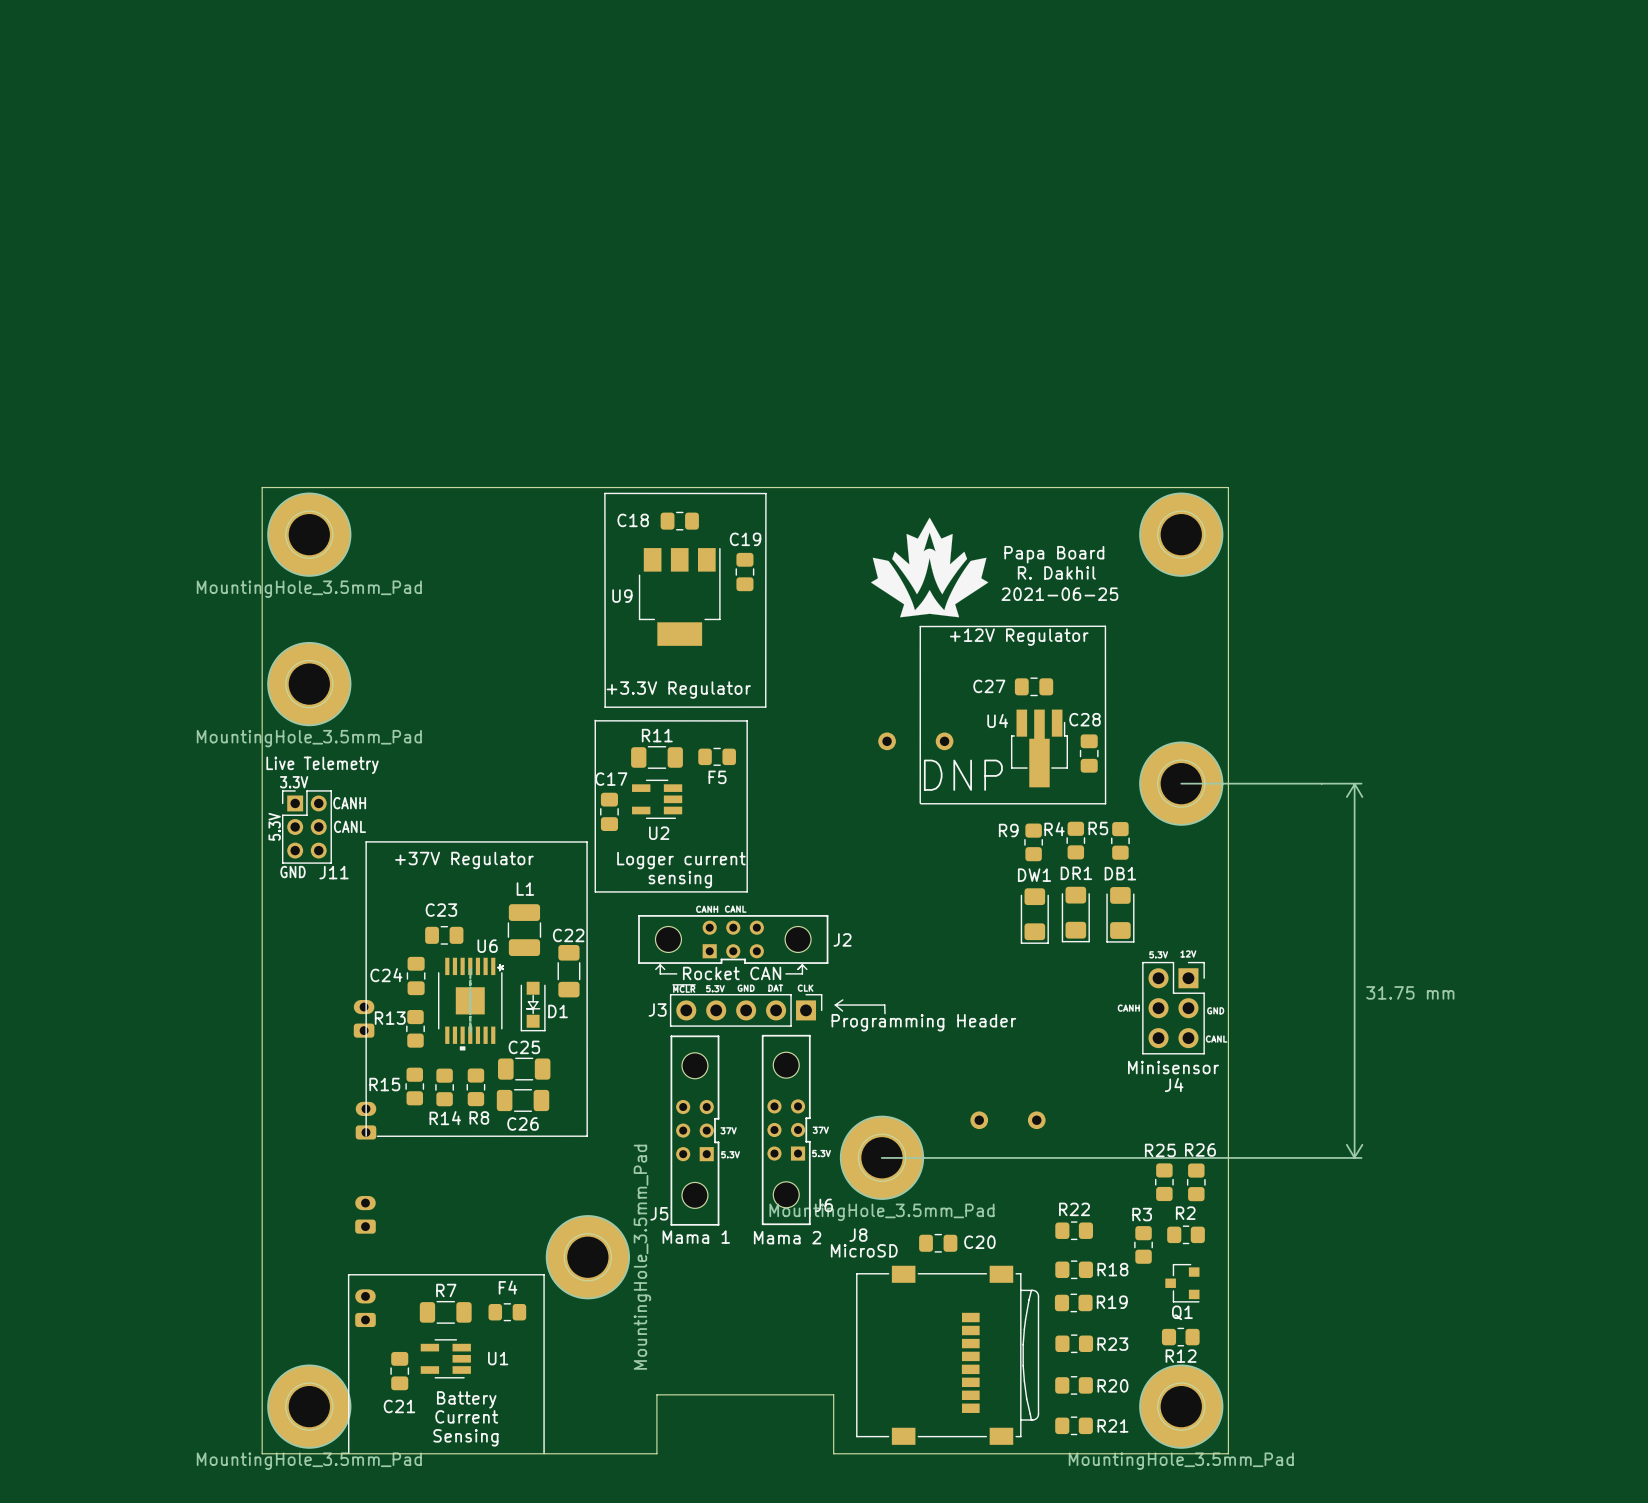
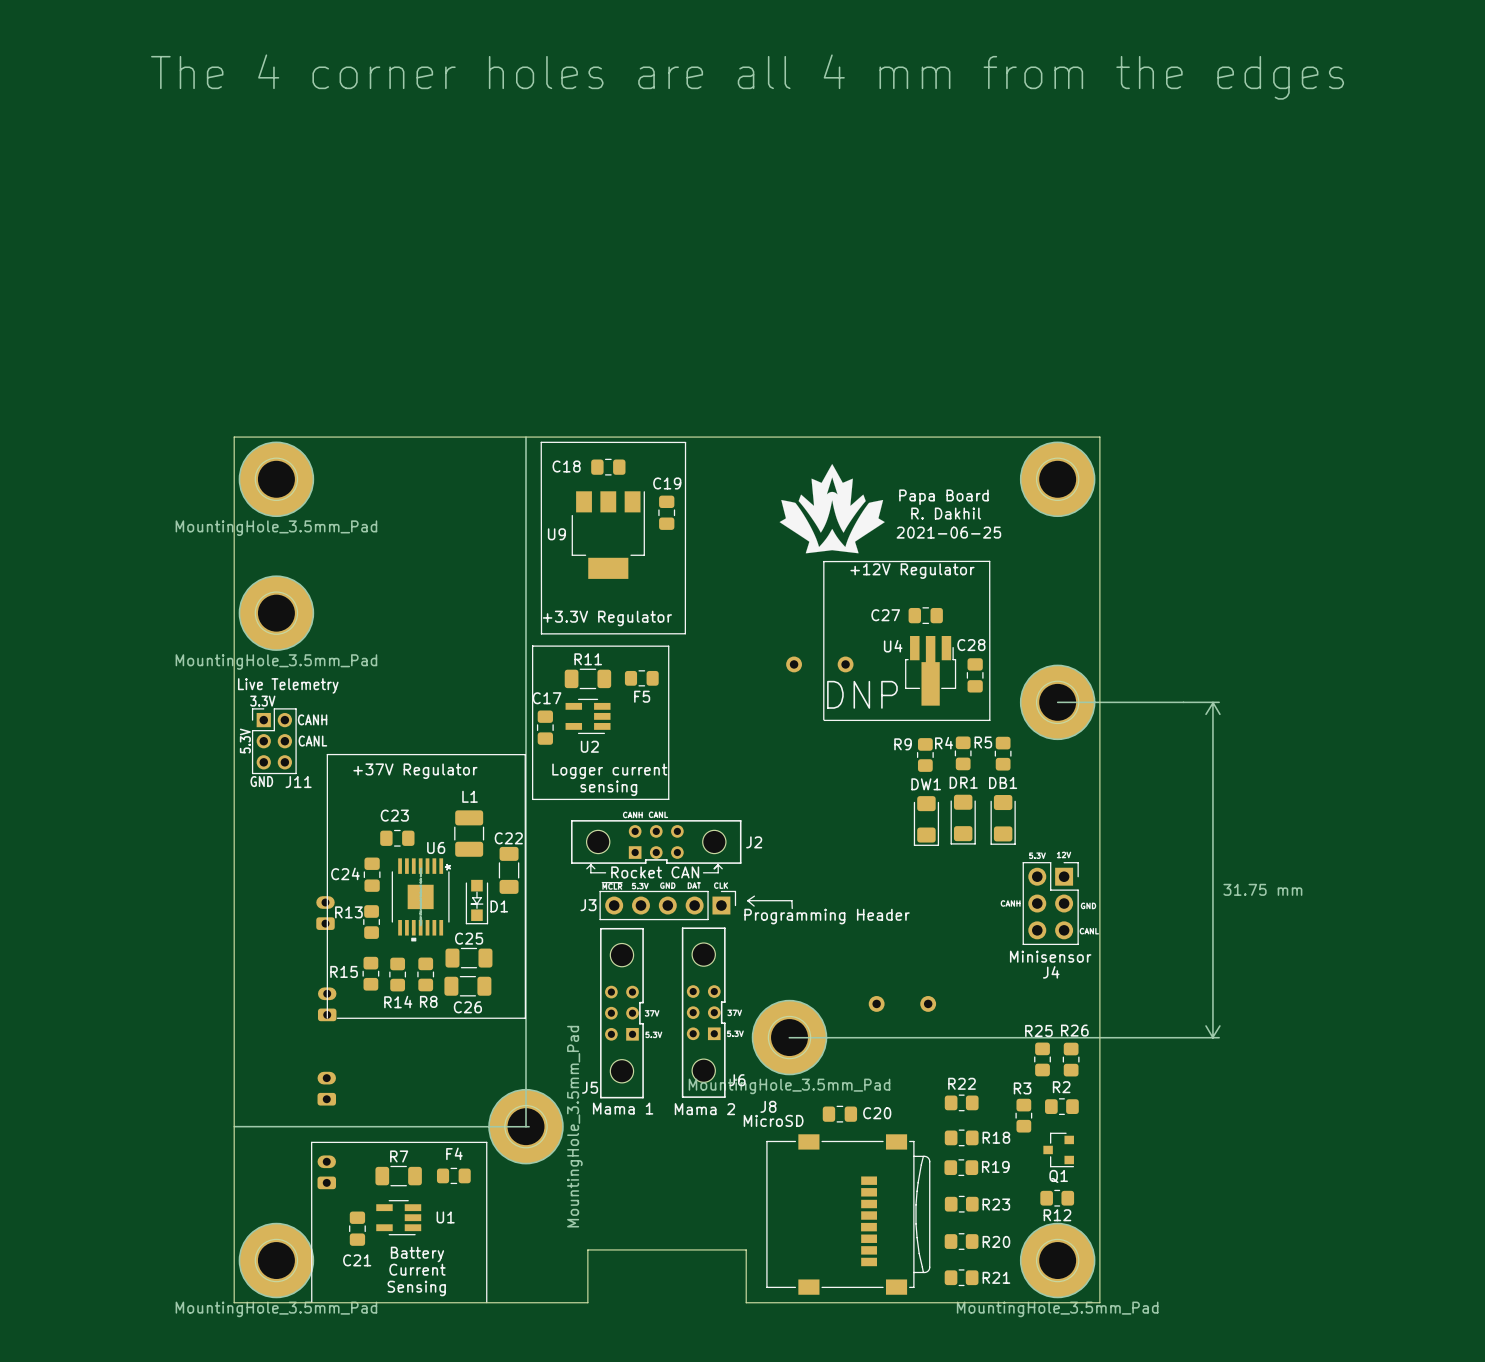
text: none -> The 4 corner holes are all 4 mm from the edges (747, 77)
line: none -> (526, 437) (526, 1126)
line: none -> (234, 1126) (529, 1126)

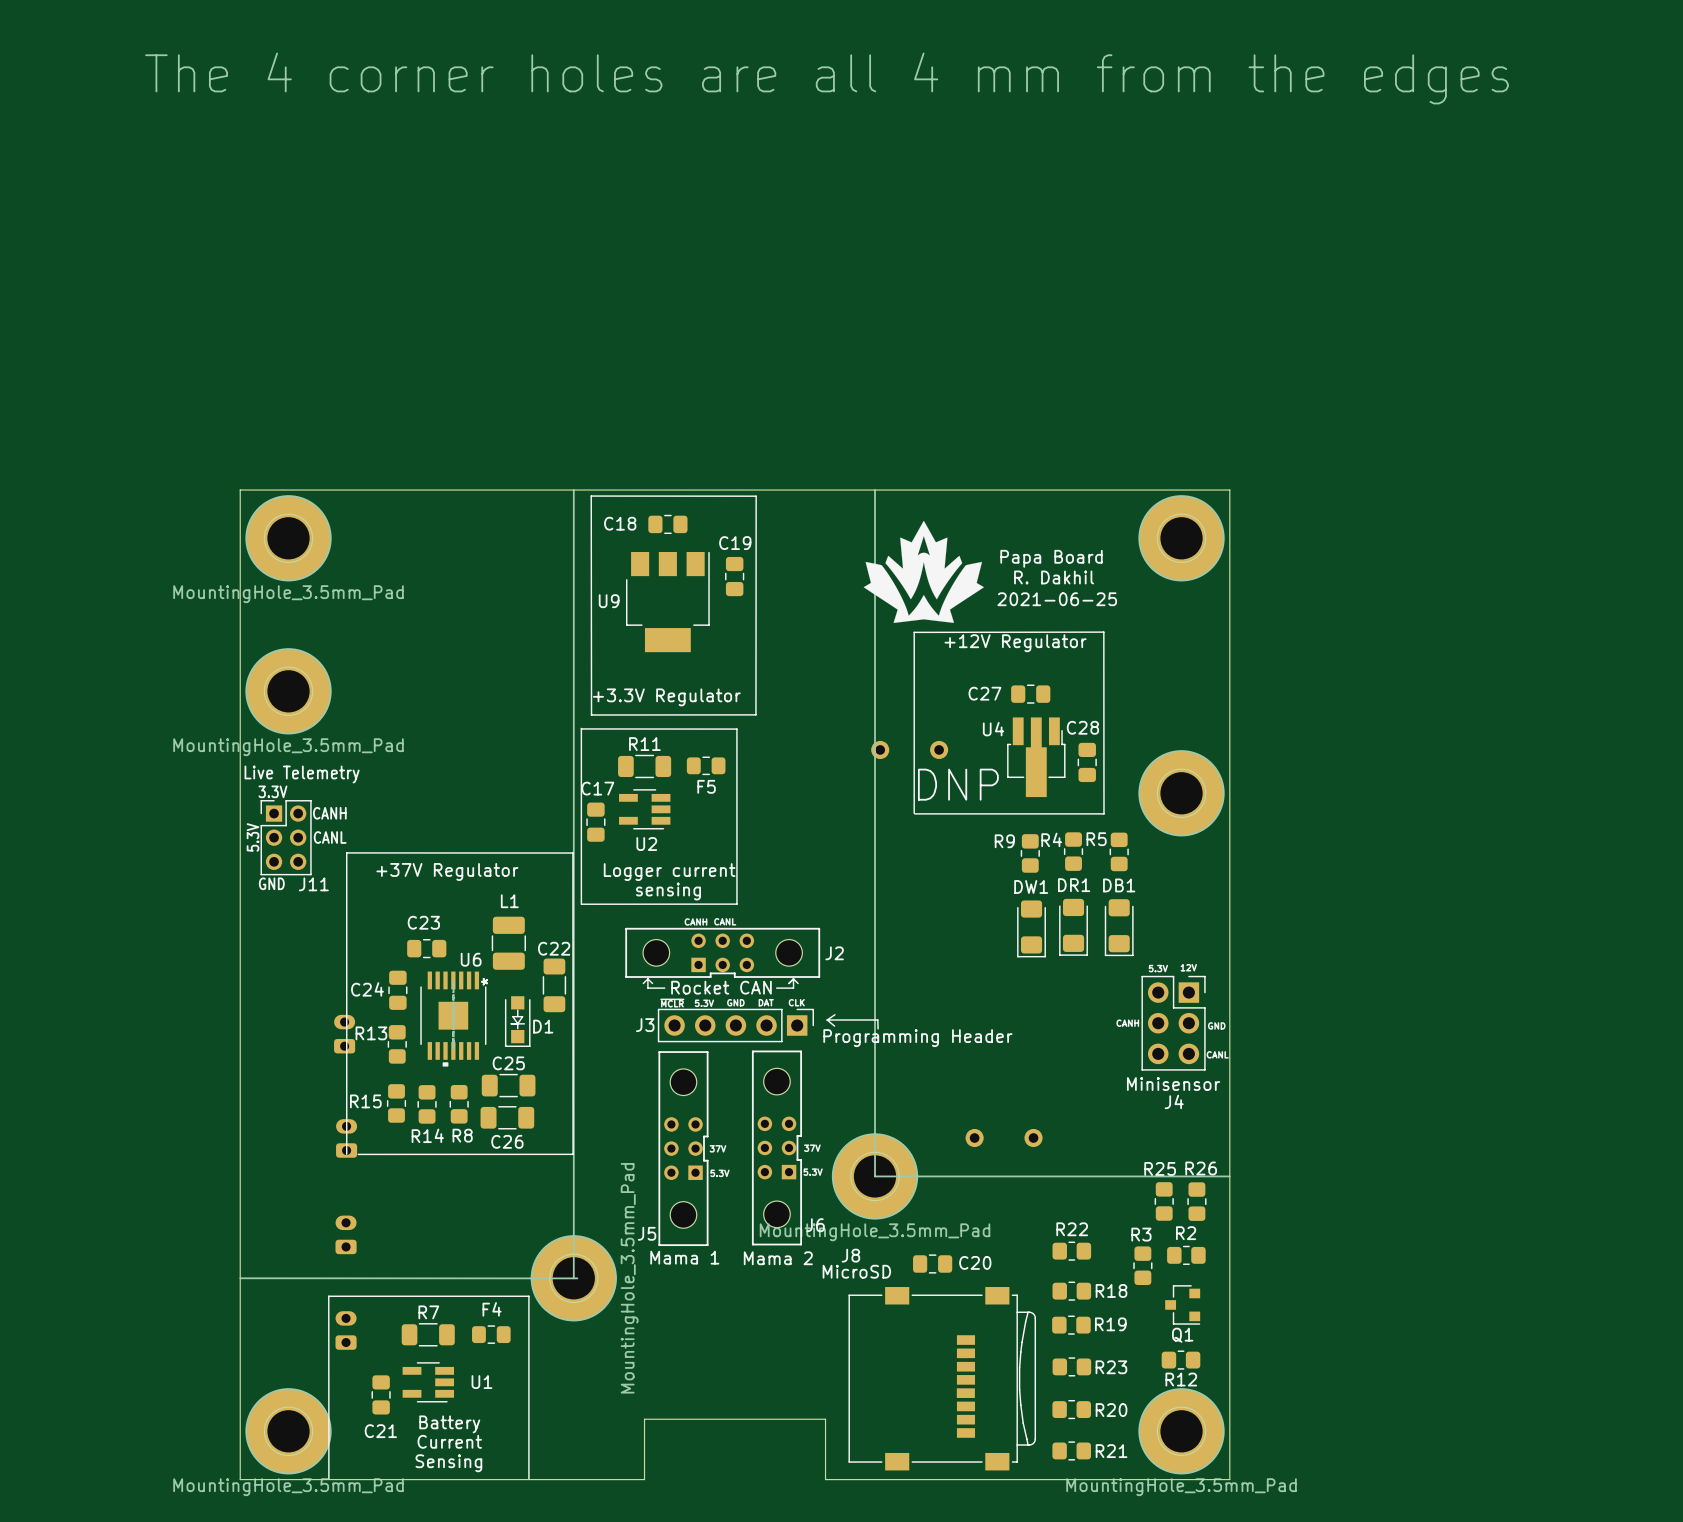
line: none -> (875, 490) (875, 1176) (1229, 1176)
line: (1057, 702) (1219, 702) -> none
line: (1212, 703) (1205, 714) -> none
line: (1219, 714) (1212, 702) (1212, 1037) (1205, 1025) -> none
text: 31.75 mm (1262, 889) -> none
line: (1219, 1025) (1212, 1037) -> none
line: (789, 1037) (1219, 1037) -> none

